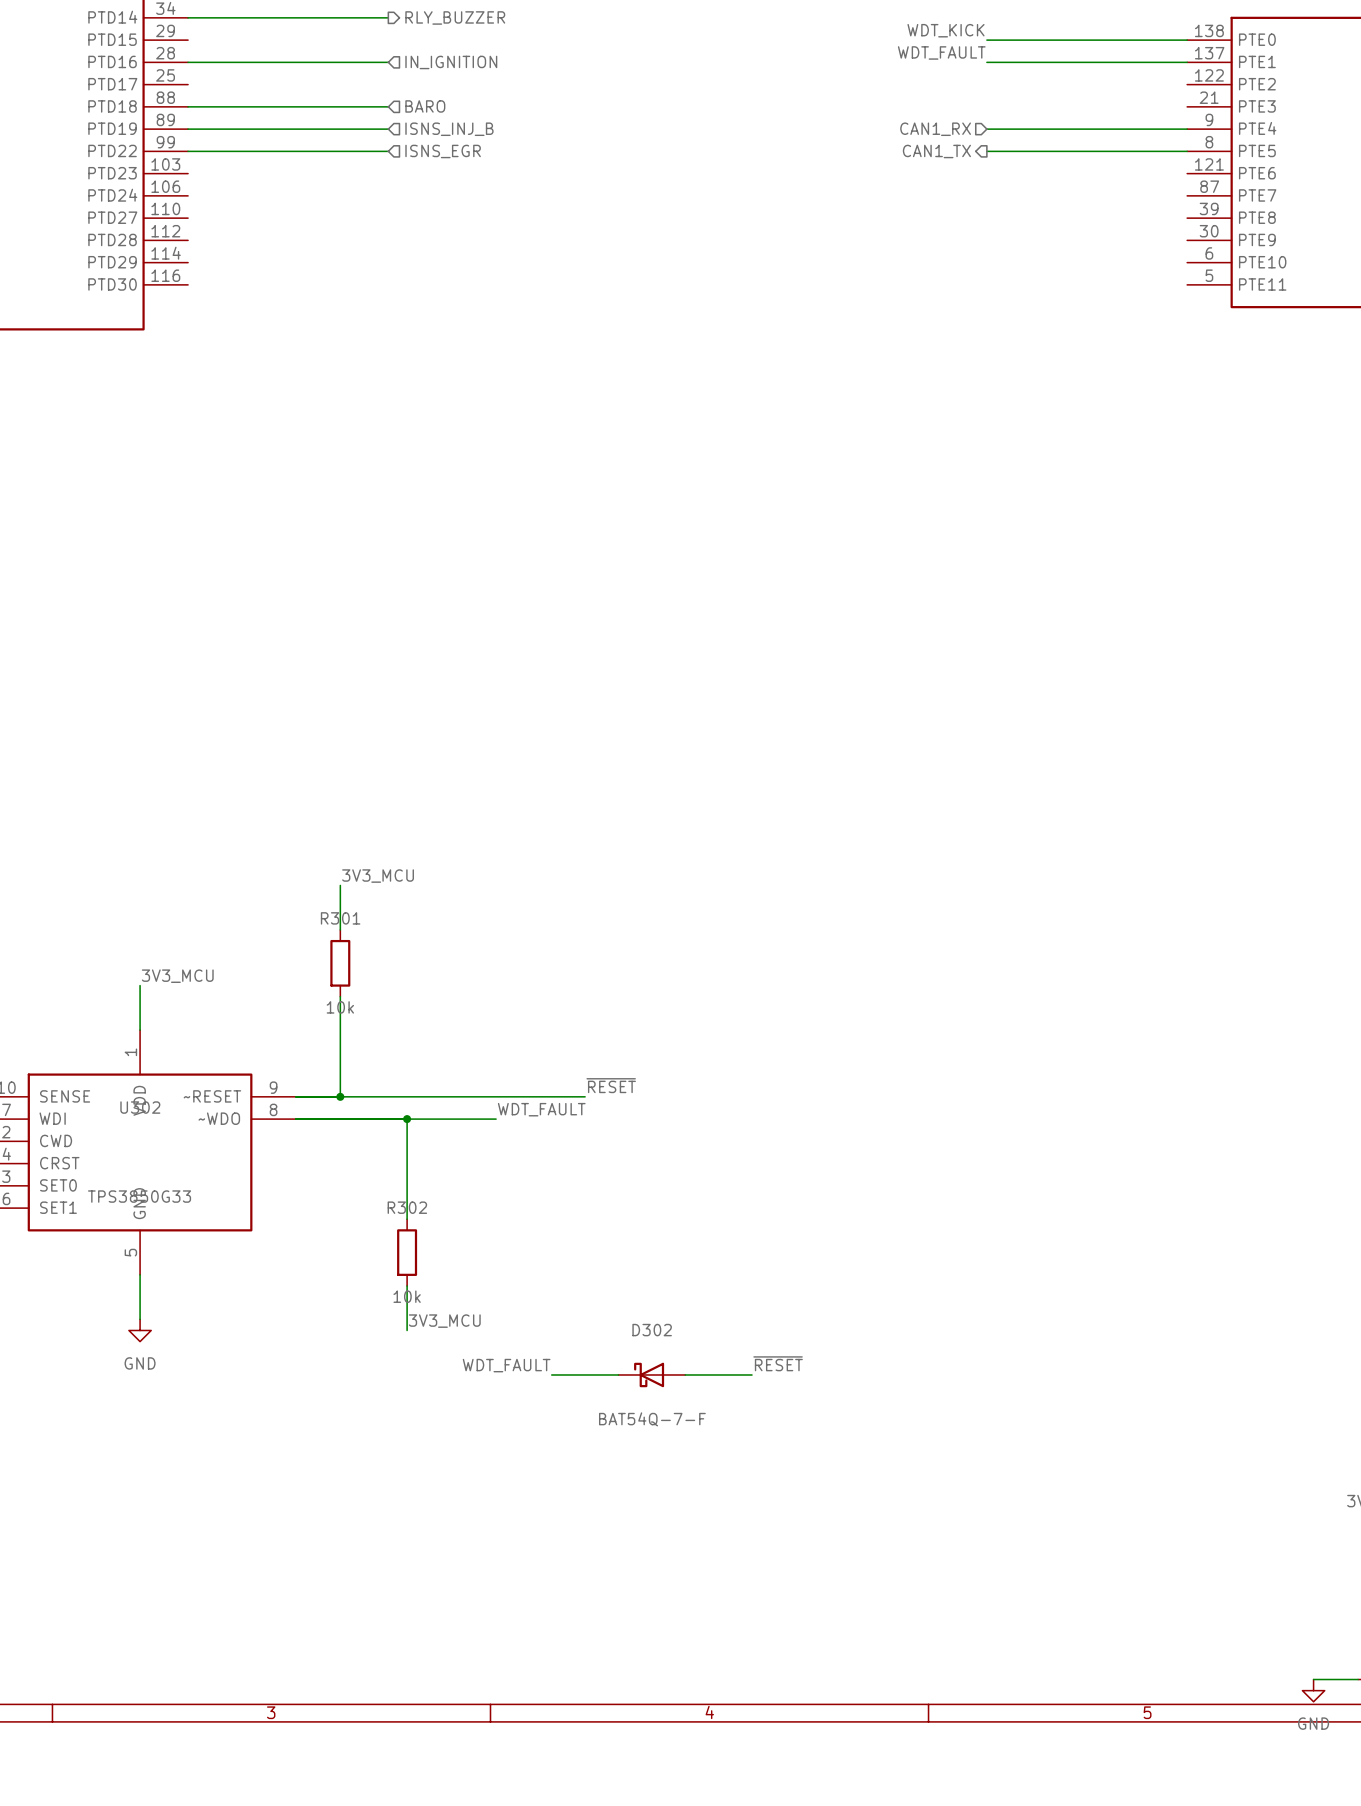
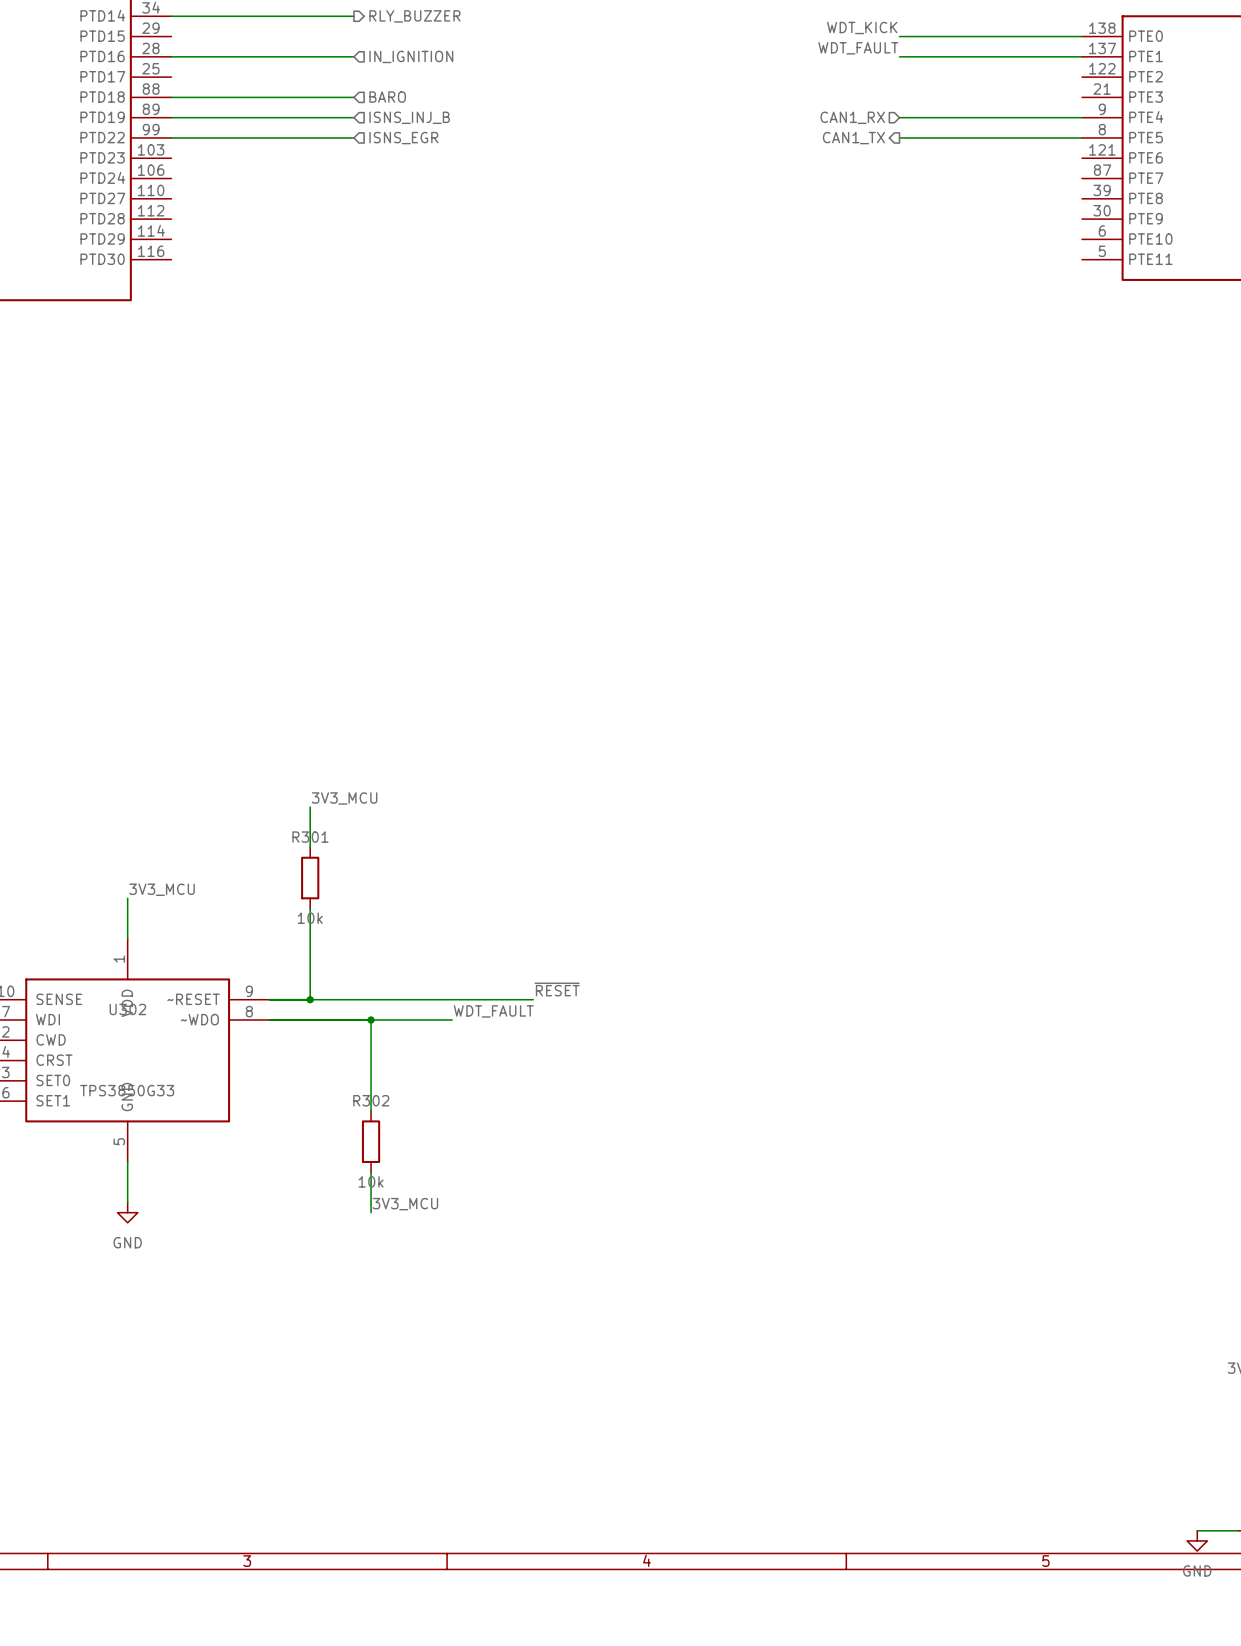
label: ~{RESET} (778, 1363) -> none
label: WDT_FAULT (506, 1365) -> none
wire: (551, 1374) (618, 1374) -> none
D302: BAT54Q-7-F (651, 1374) -> none
wire: (685, 1374) (752, 1374) -> none

